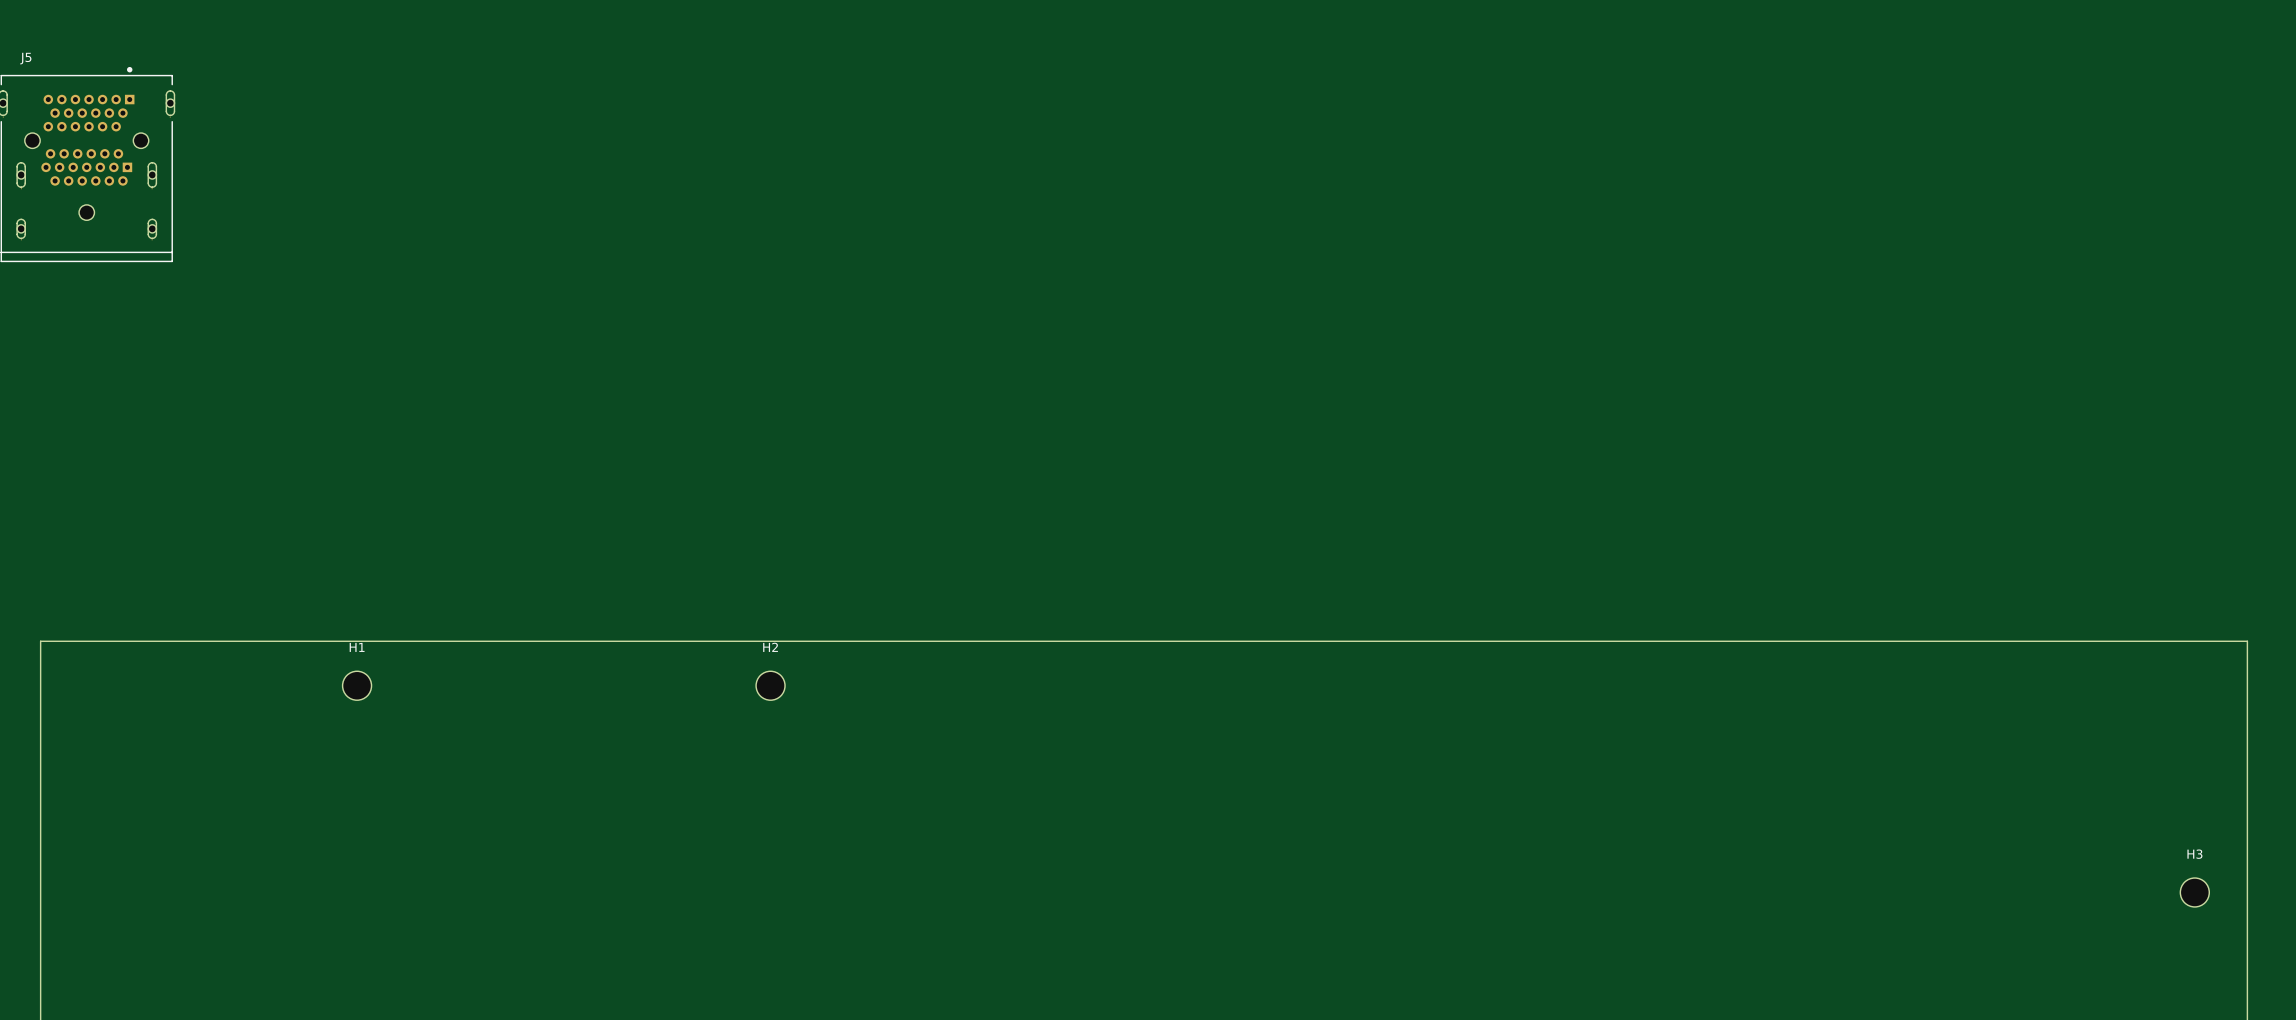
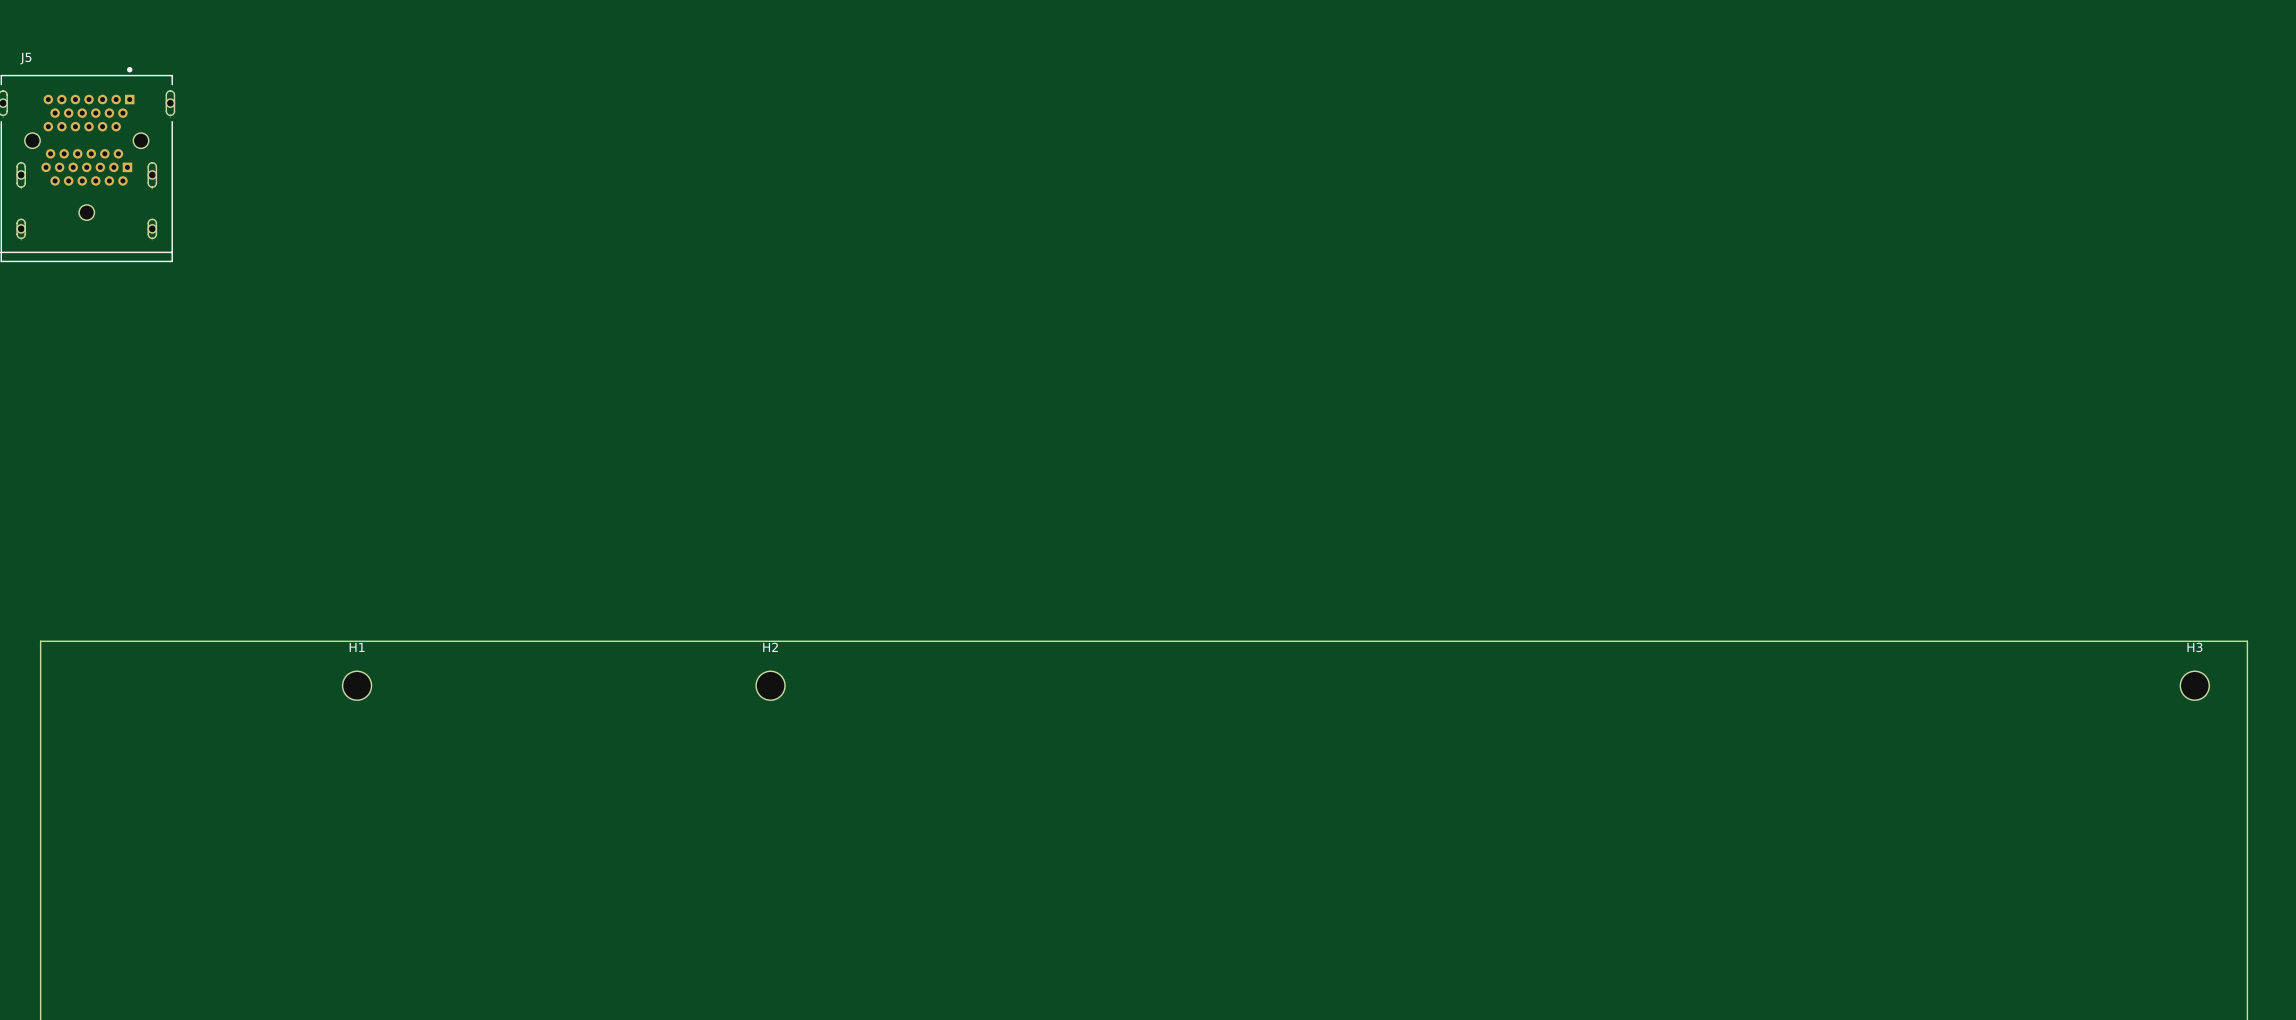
H3 position: (2194, 892) -> (2194, 685)

